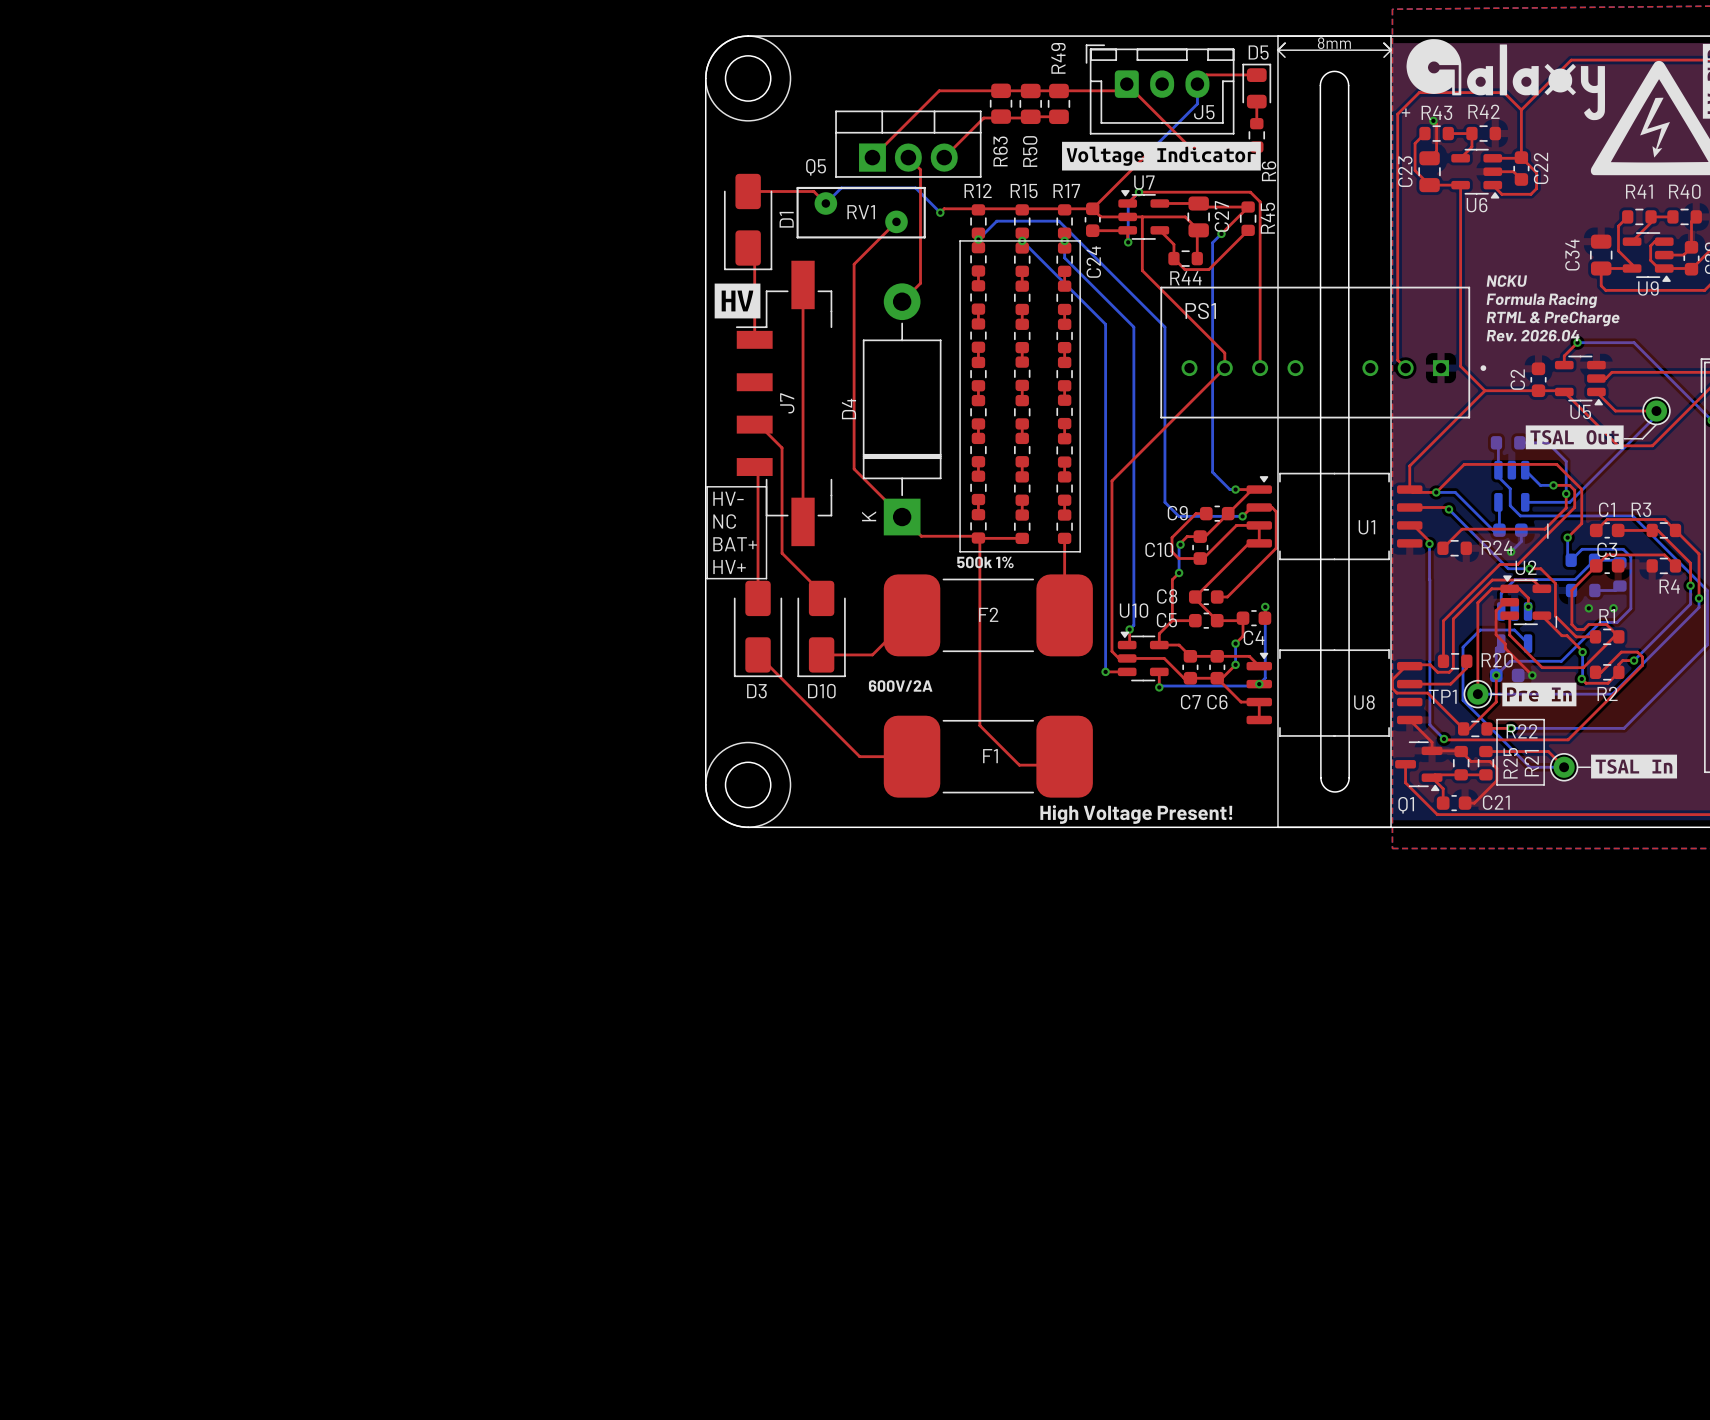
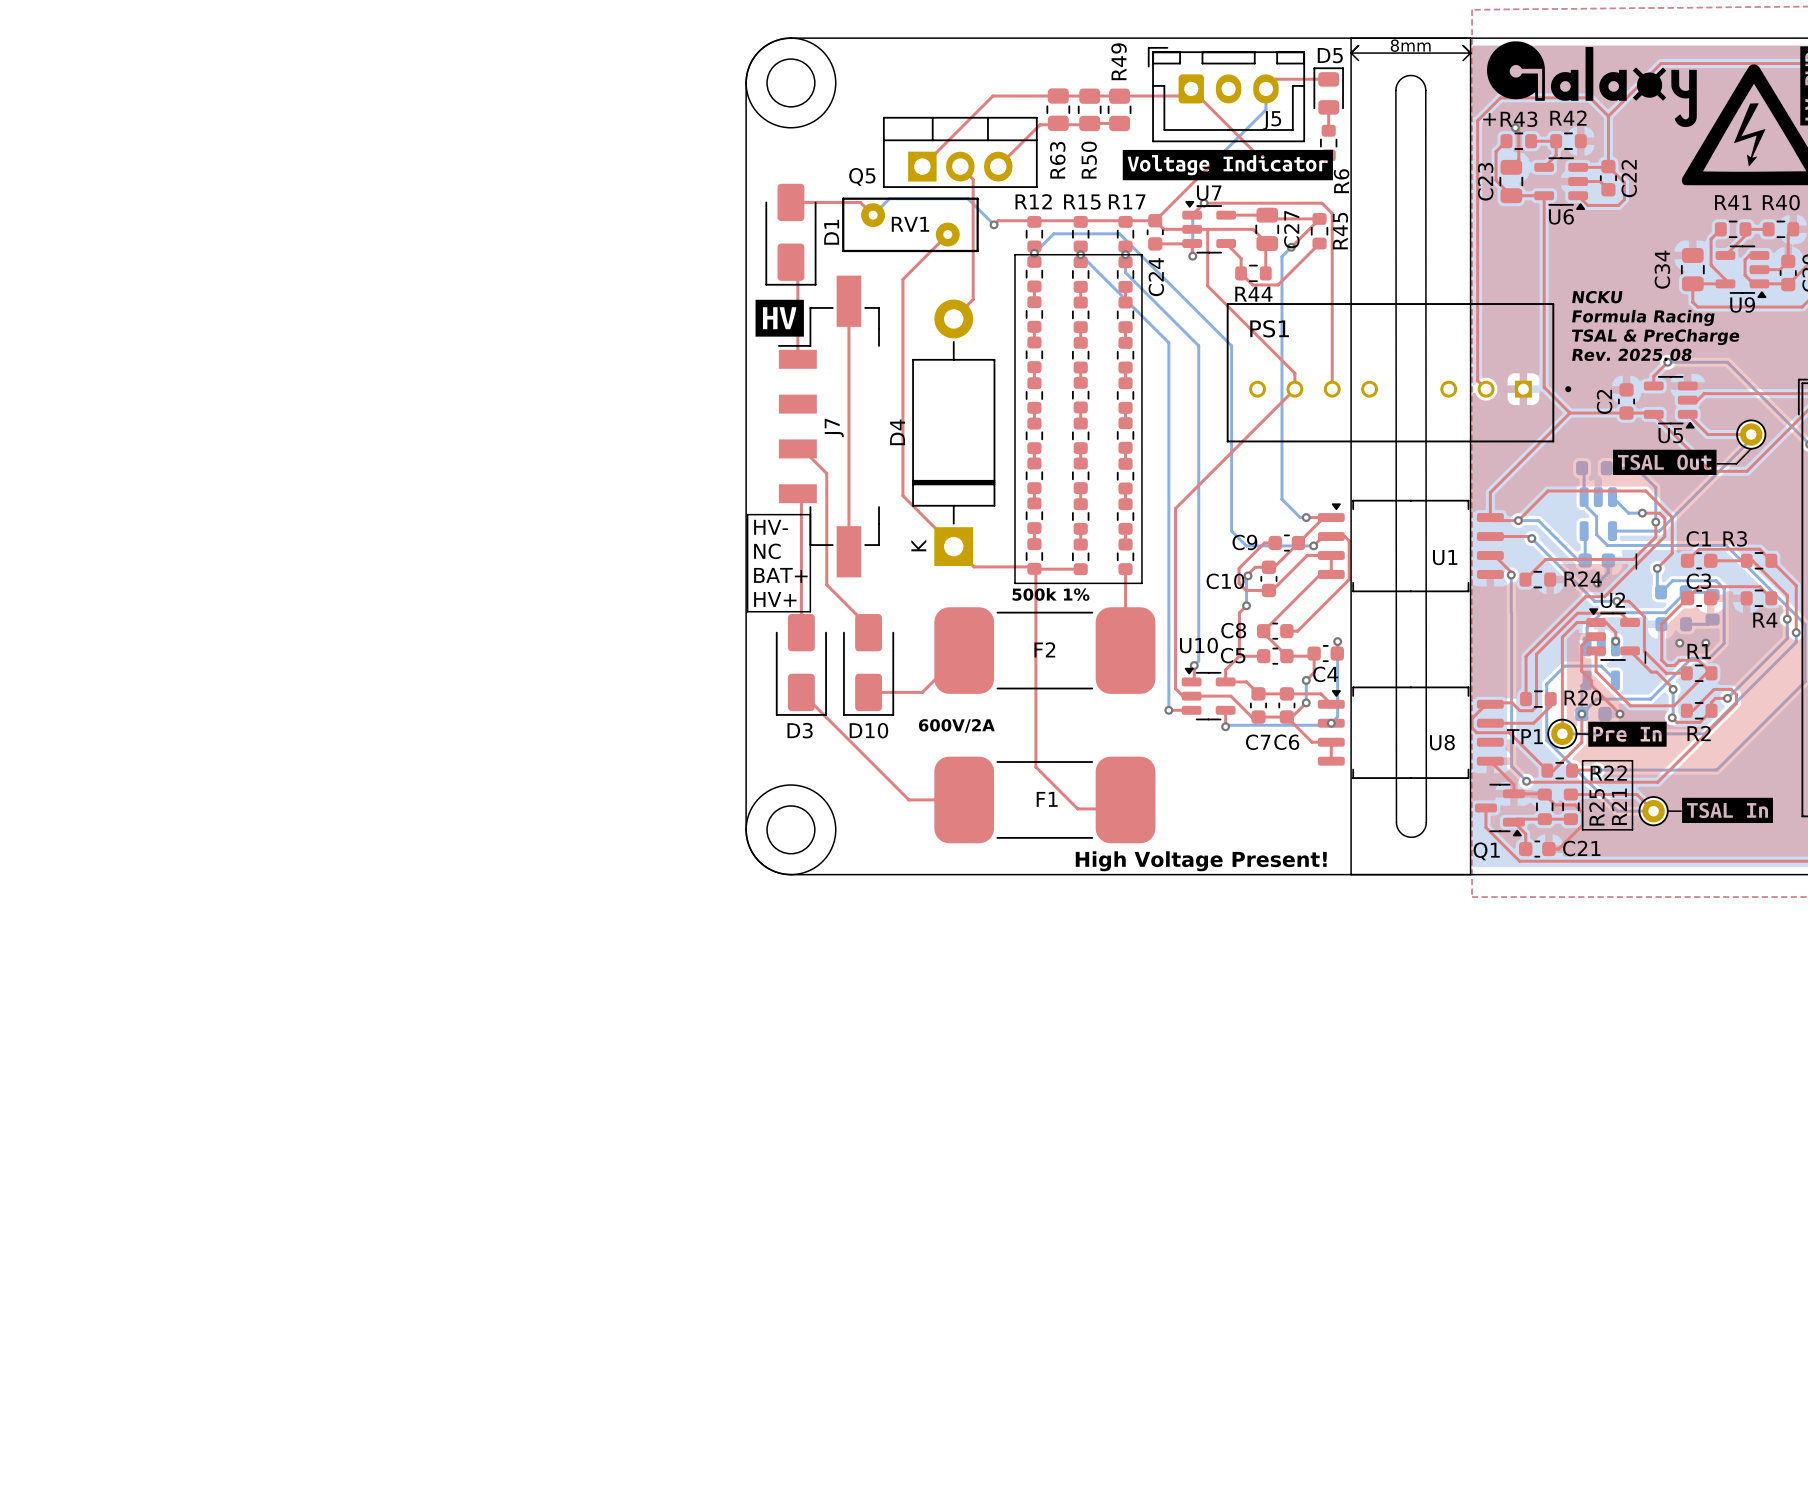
text: RTML & PreCharge (1553, 318) -> TSAL & PreCharge (1655, 337)
text: Rev. 2026.04 (1533, 335) -> Rev. 2025.08 (1631, 354)

